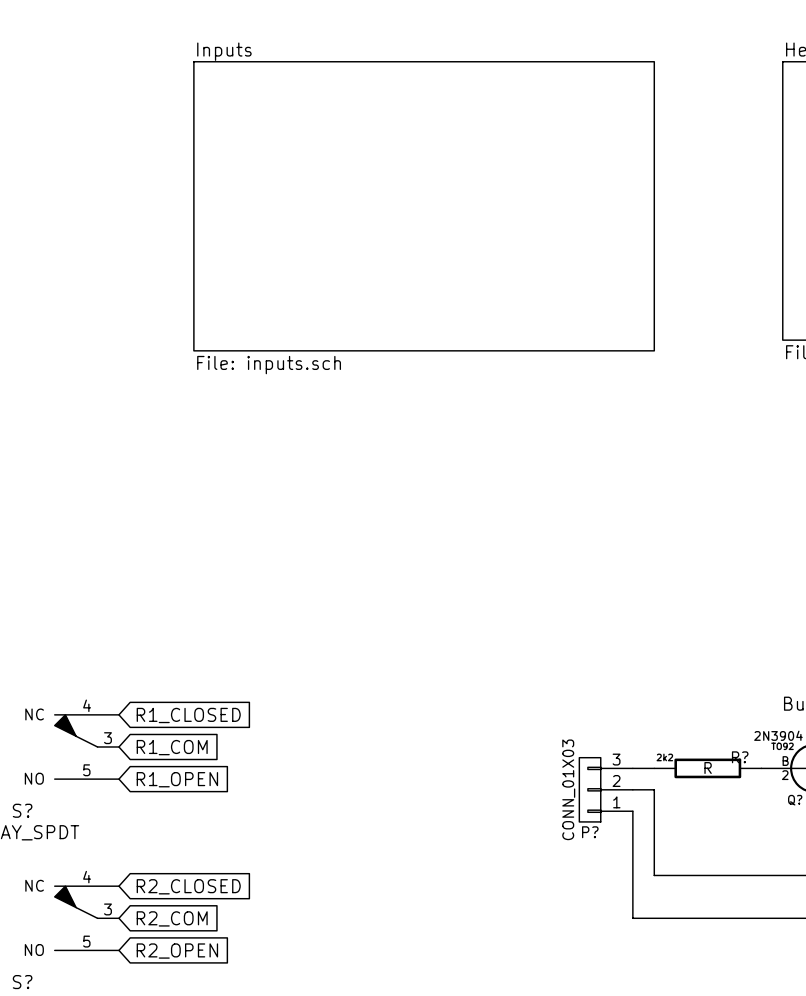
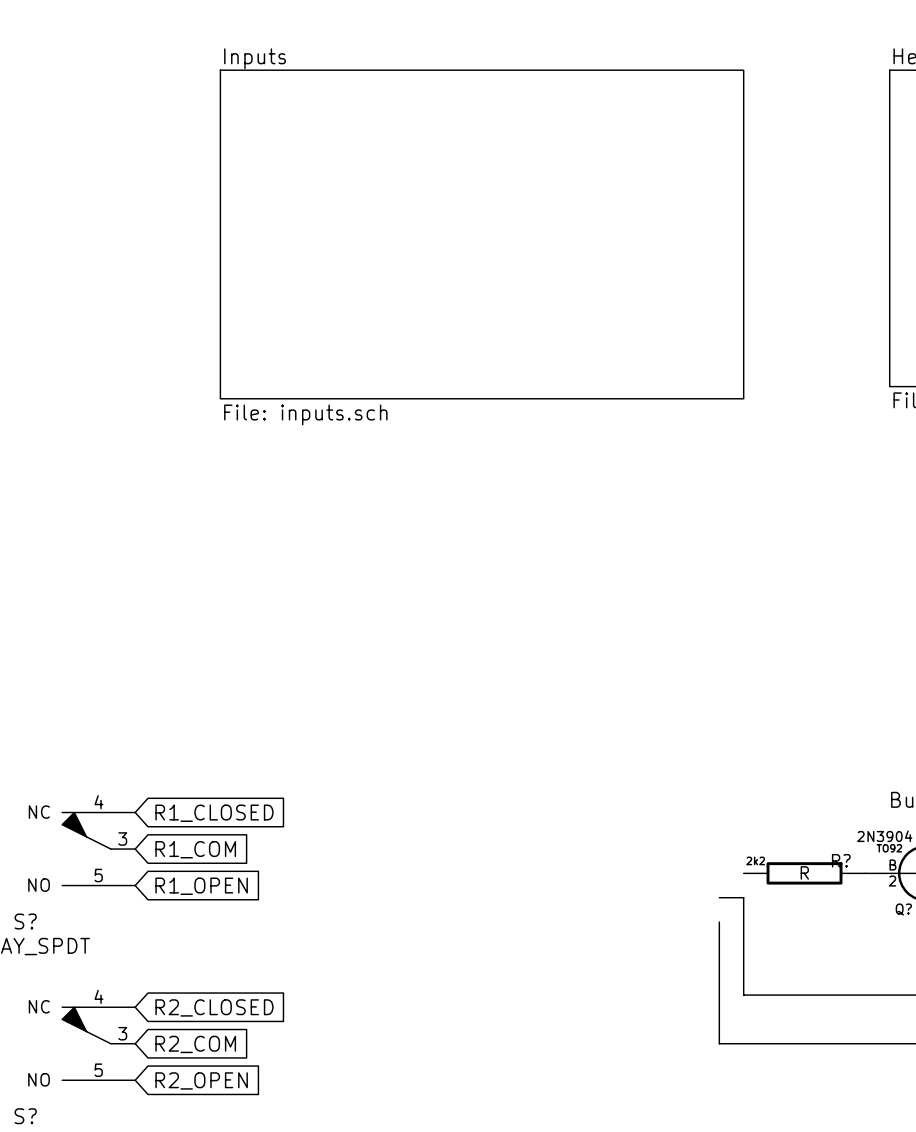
wire: (632, 768) (654, 768) -> none
P?: CONN_01X03 (606, 789) -> none

